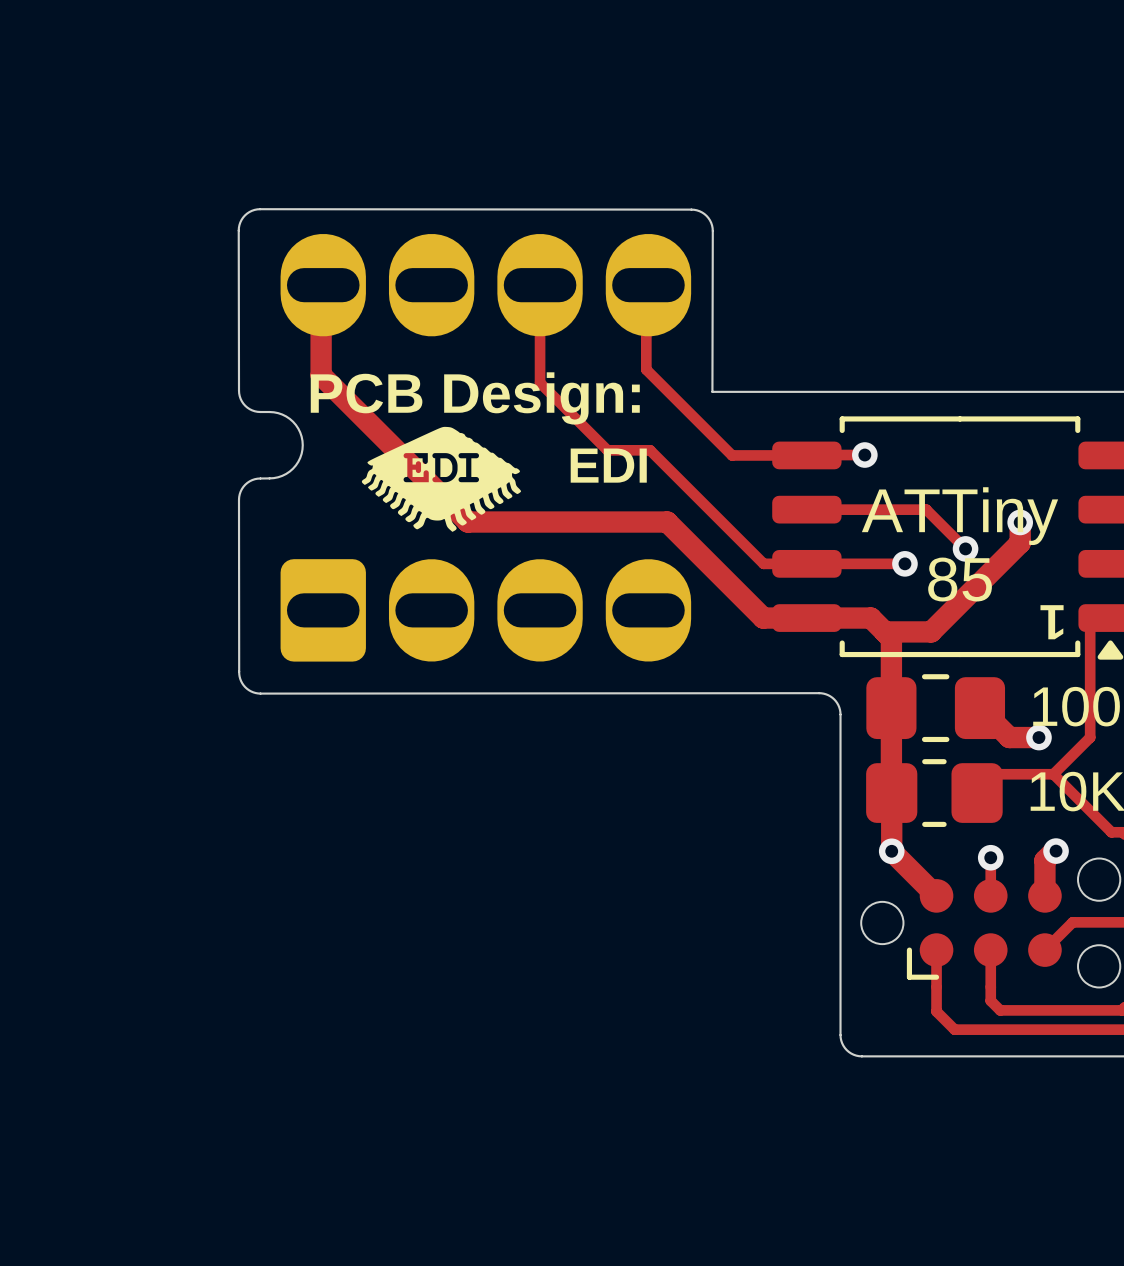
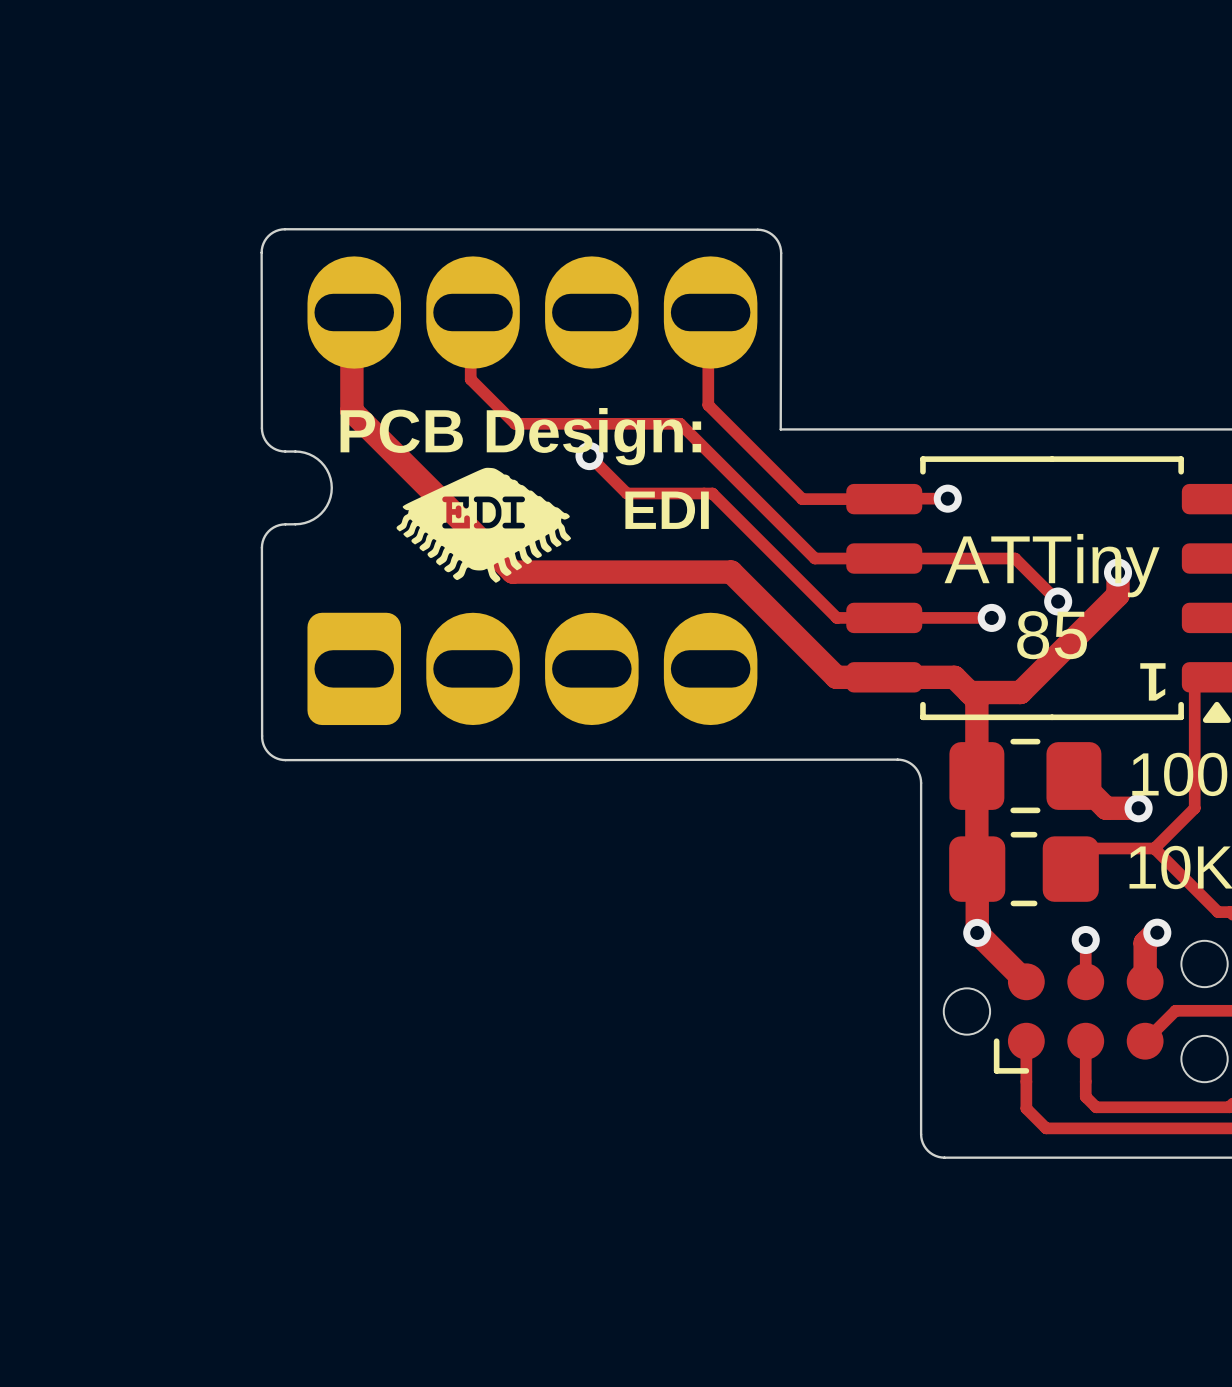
track: none -> (473, 312) (470, 314) (470, 379) (515, 423) (680, 423) (814, 558) (884, 558)
track: (540, 285) (540, 382) (607, 450) -> (589, 456) (626, 493) (665, 493)
via: none -> (589, 456)

